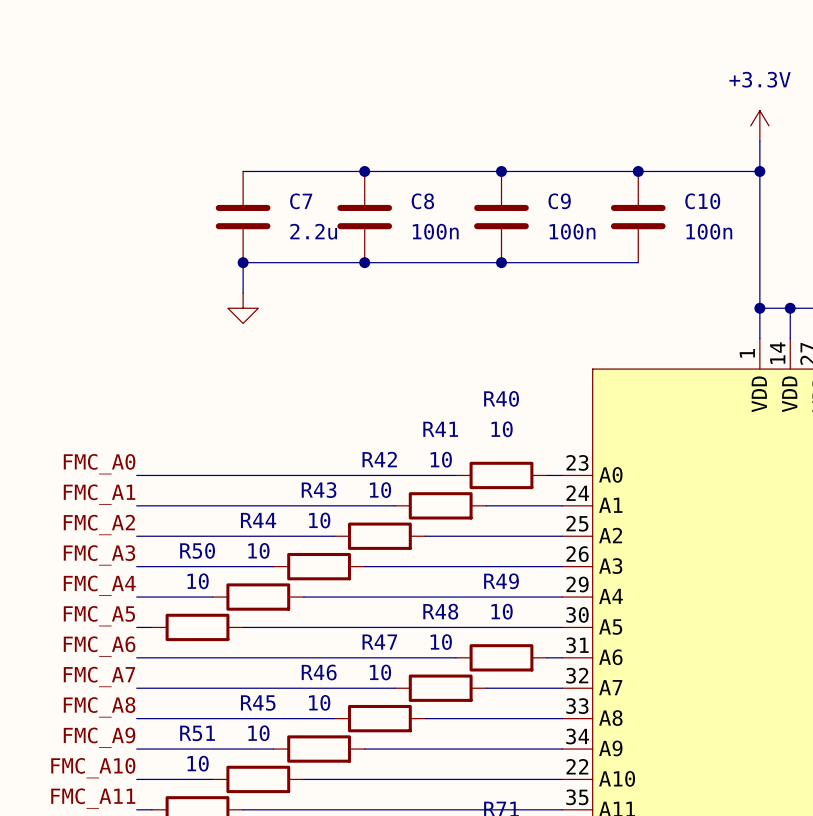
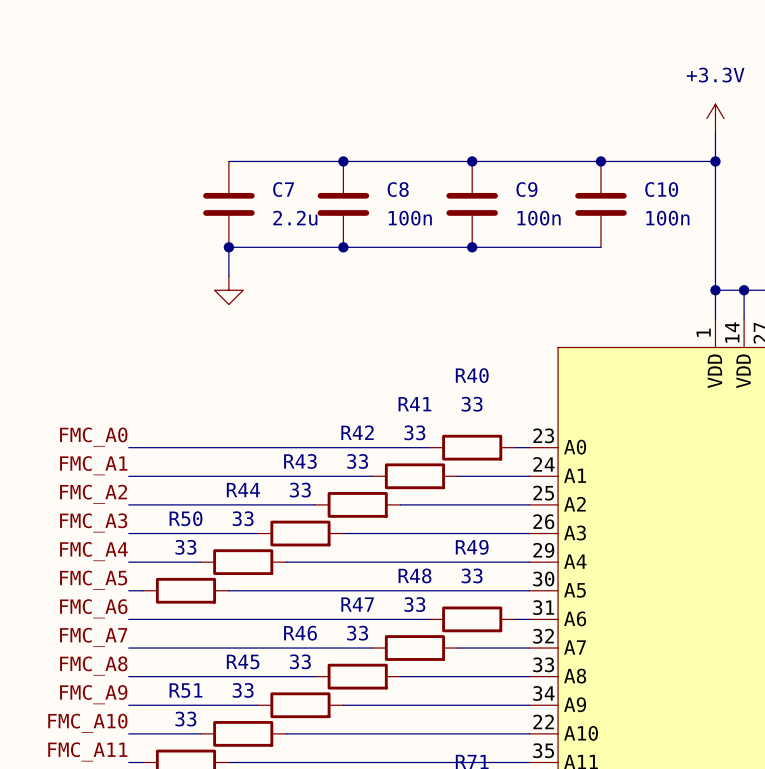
R40 value: 10 (502, 429) -> 33 (472, 404)
R41 value: 10 (441, 459) -> 33 (414, 432)
R42 value: 10 (380, 490) -> 33 (357, 461)
R43 value: 10 (319, 520) -> 33 (300, 490)
R44 value: 10 (258, 550) -> 33 (243, 518)
R50 value: 10 (198, 581) -> 33 (185, 547)
R49 value: 10 (502, 611) -> 33 (472, 575)
R48 value: 10 (441, 642) -> 33 (414, 604)
R47 value: 10 (380, 672) -> 33 (357, 633)
R46 value: 10 (319, 702) -> 33 (300, 661)
R45 value: 10 (258, 733) -> 33 (243, 690)
R51 value: 10 (198, 763) -> 33 (185, 719)

